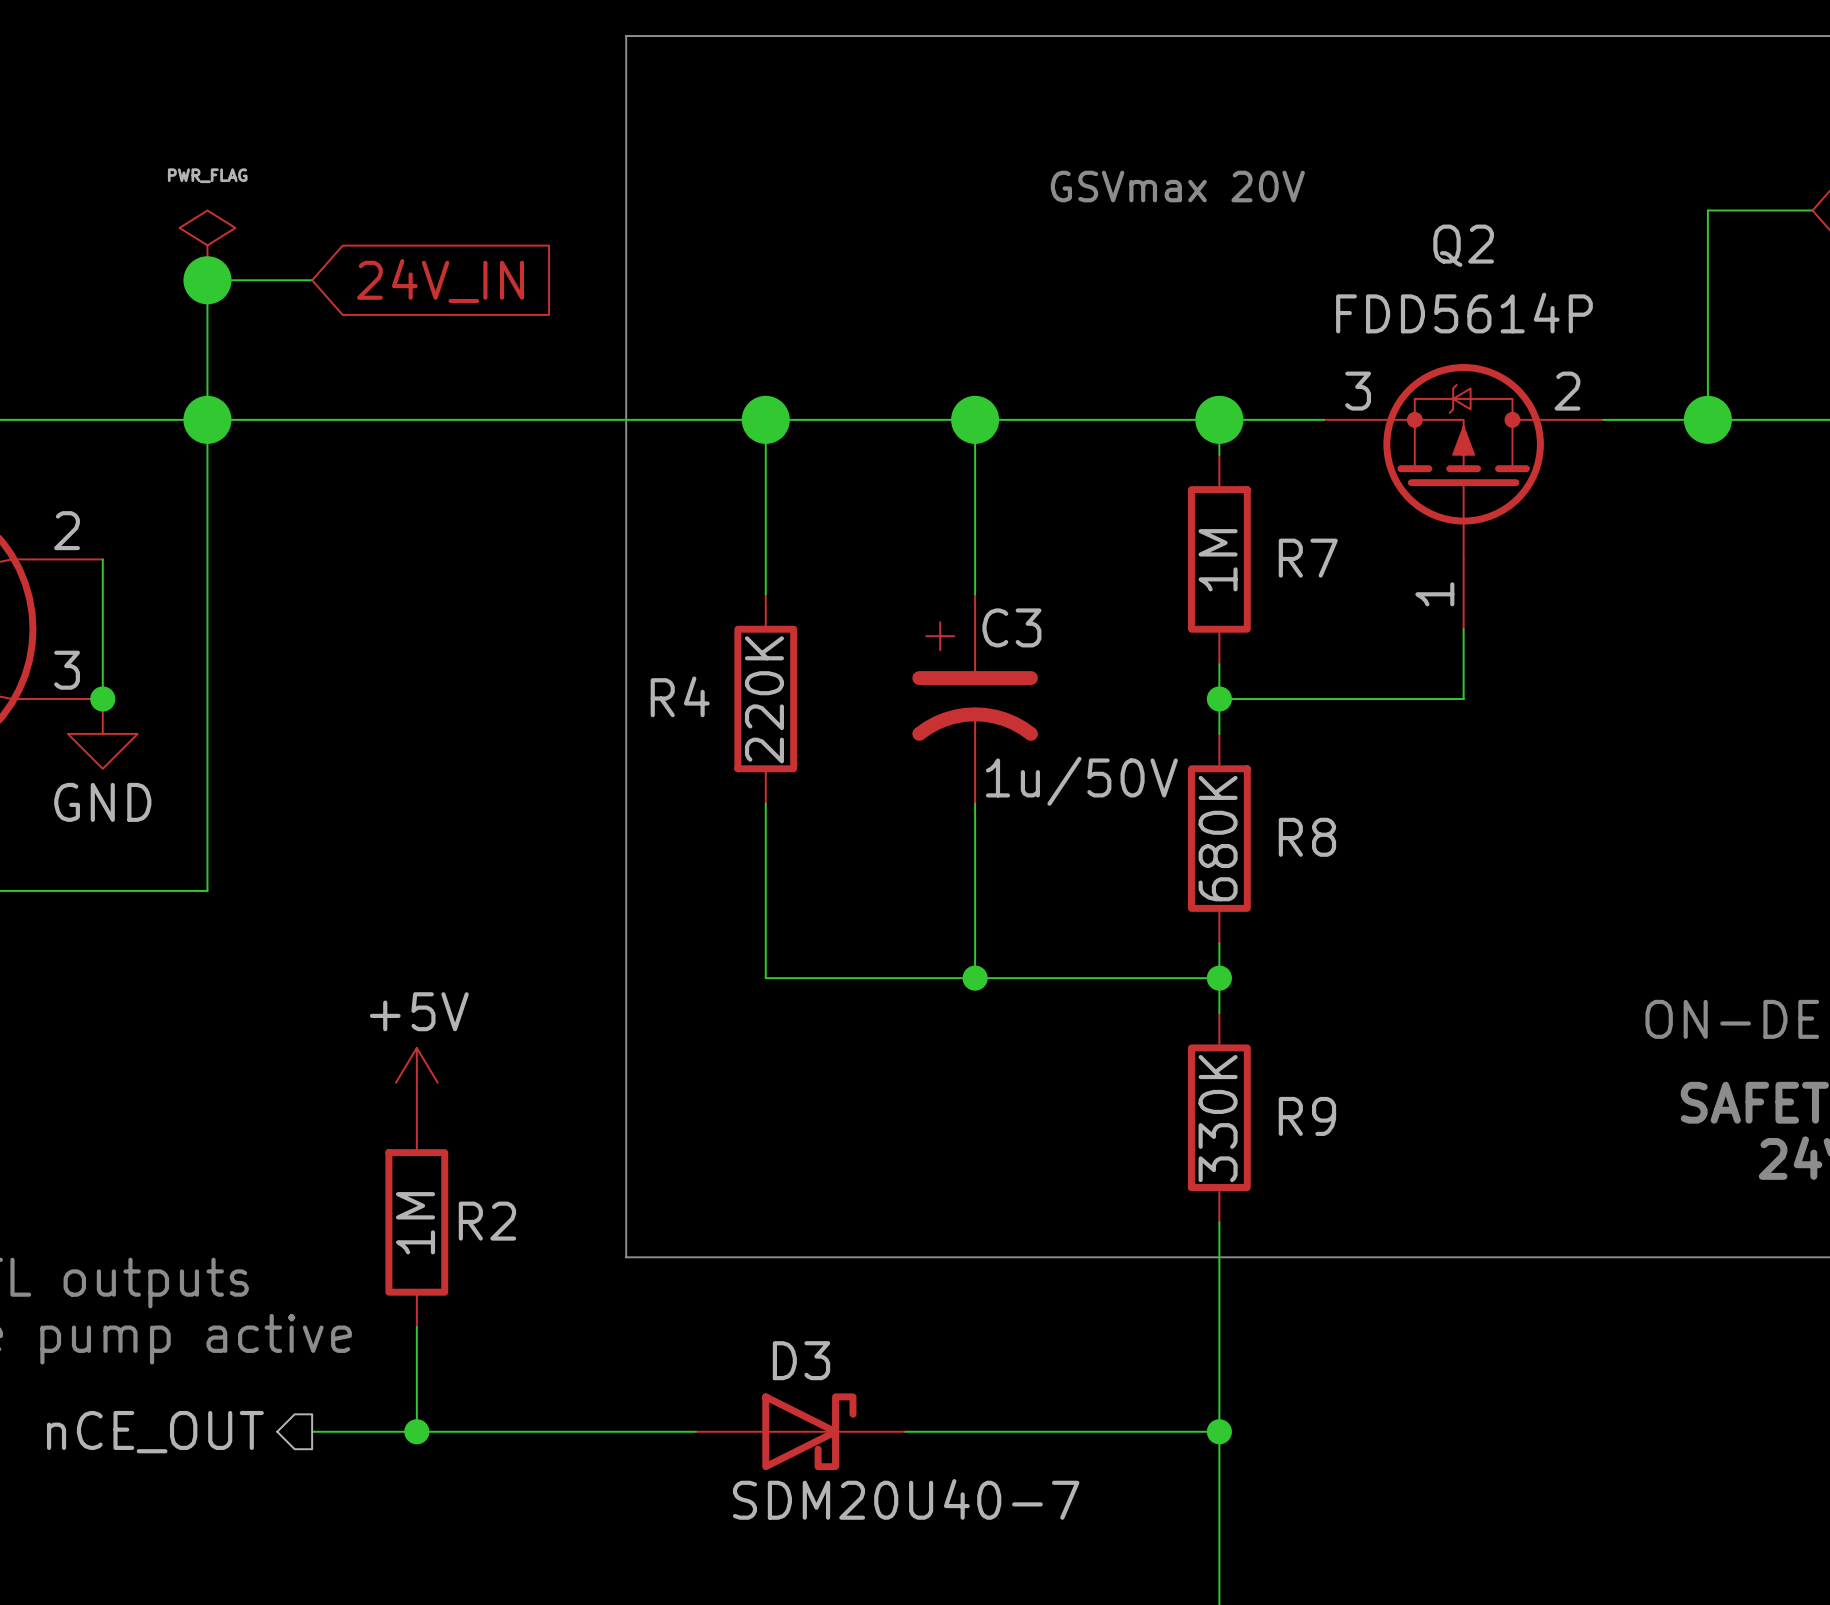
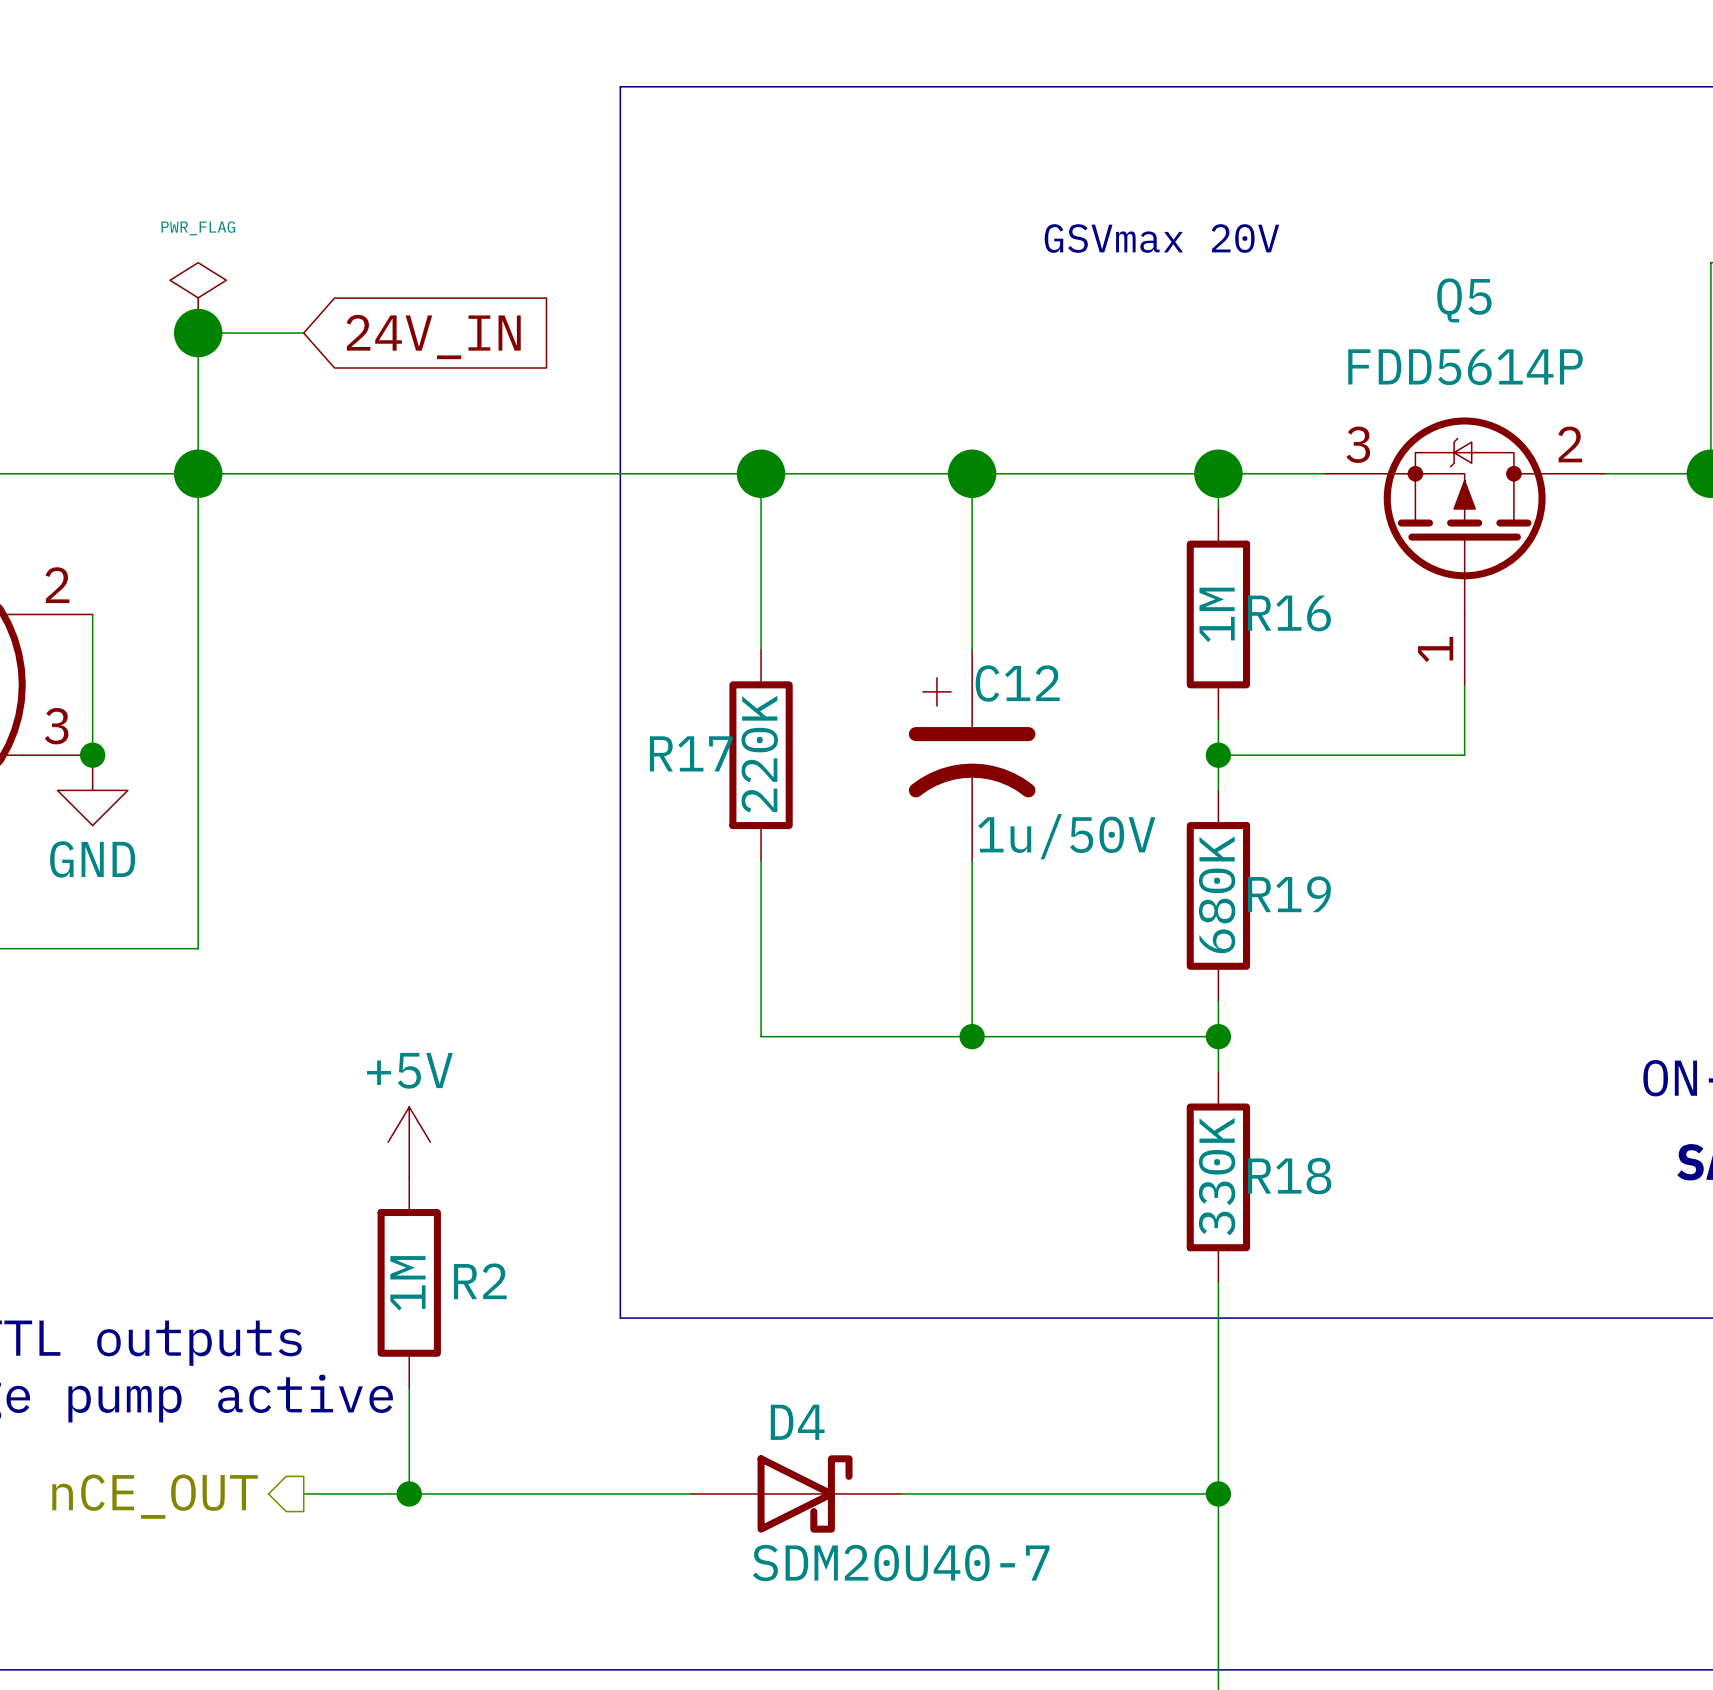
Q2 name: Q2 (1463, 245) -> Q5 (1464, 300)
R7 name: R7 (1308, 558) -> R16 (1289, 613)
C3 name: C3 (1011, 627) -> C12 (1017, 683)
R4 name: R4 (680, 696) -> R17 (691, 753)
R8 name: R8 (1307, 837) -> R19 (1289, 894)
R9 name: R9 (1307, 1116) -> R18 (1289, 1176)
D3 name: D3 (801, 1360) -> D4 (797, 1422)

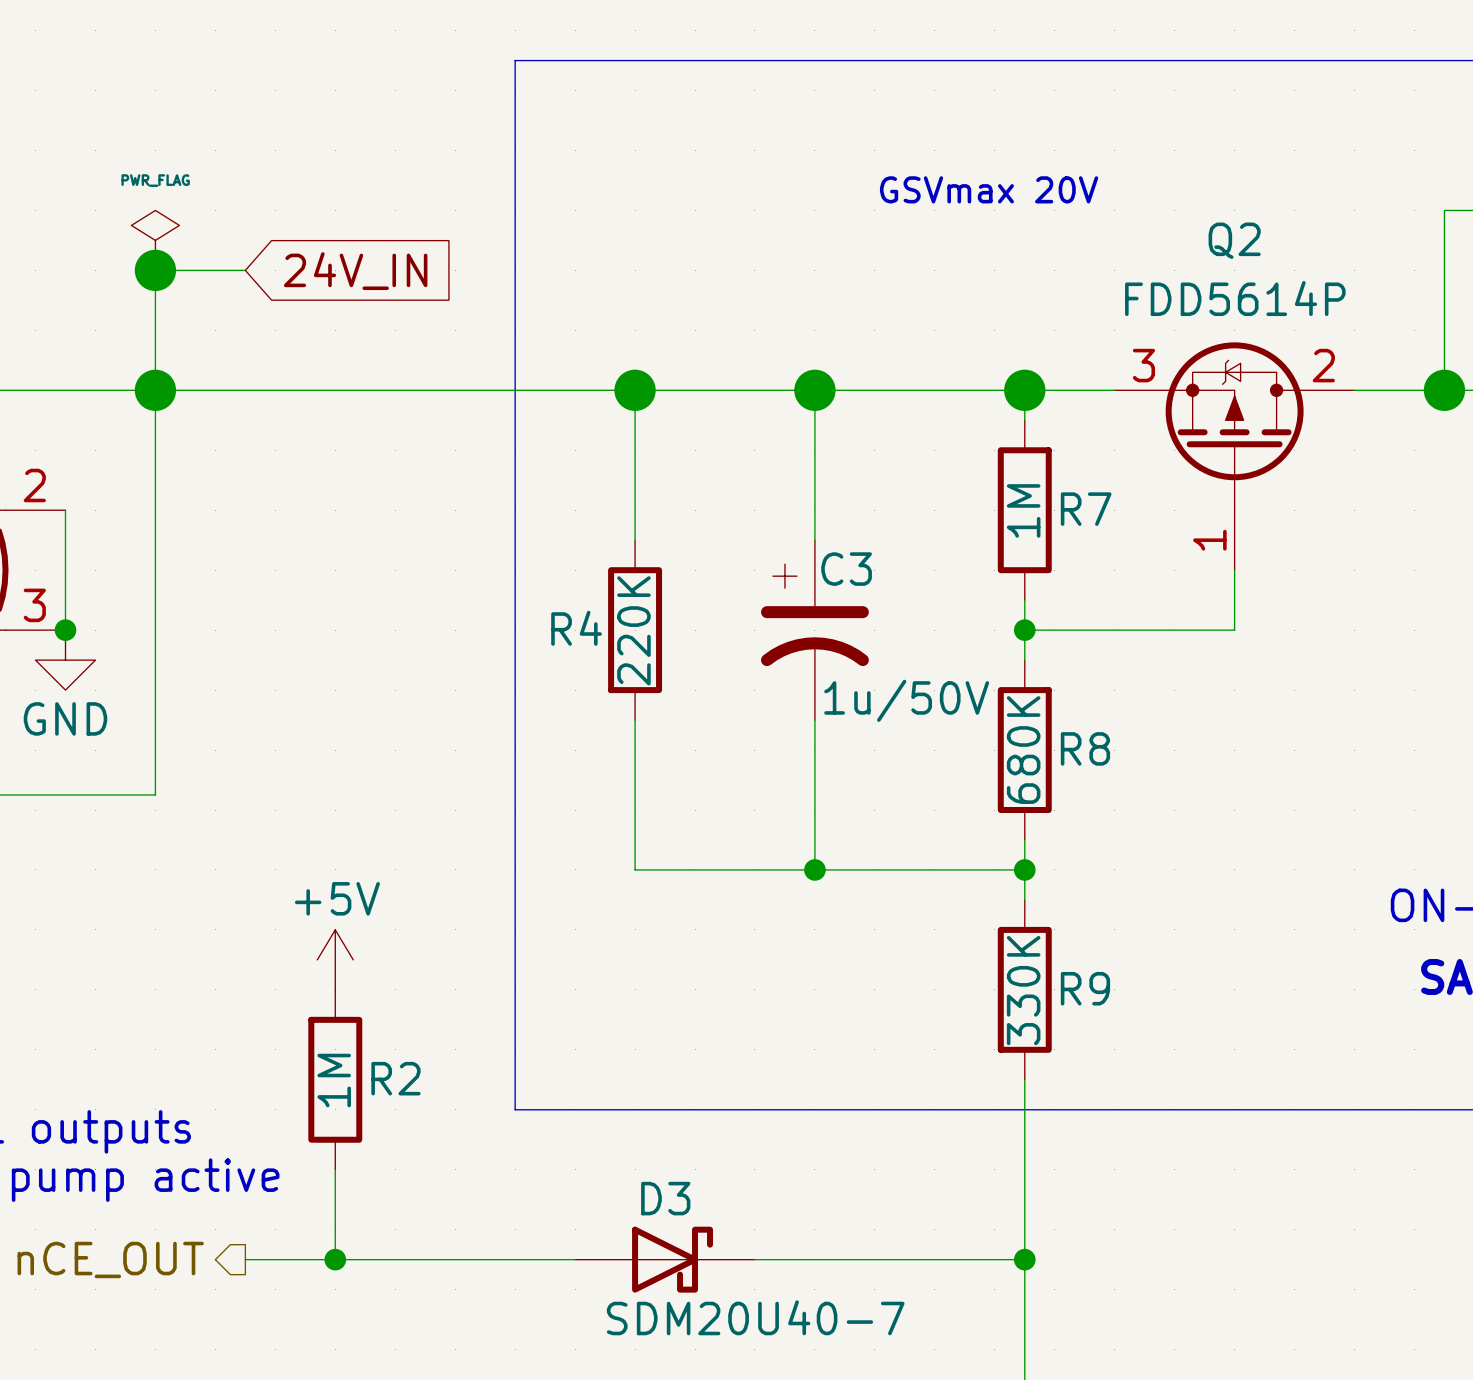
Q5 name: Q5 (1464, 300) -> Q2 (1234, 240)
R16 name: R16 (1289, 613) -> R7 (1086, 509)
C12 name: C12 (1017, 683) -> C3 (846, 569)
R17 name: R17 (691, 753) -> R4 (576, 628)
R19 name: R19 (1289, 894) -> R8 (1085, 748)
R18 name: R18 (1289, 1176) -> R9 (1085, 988)
D4 name: D4 (797, 1422) -> D3 (665, 1198)

